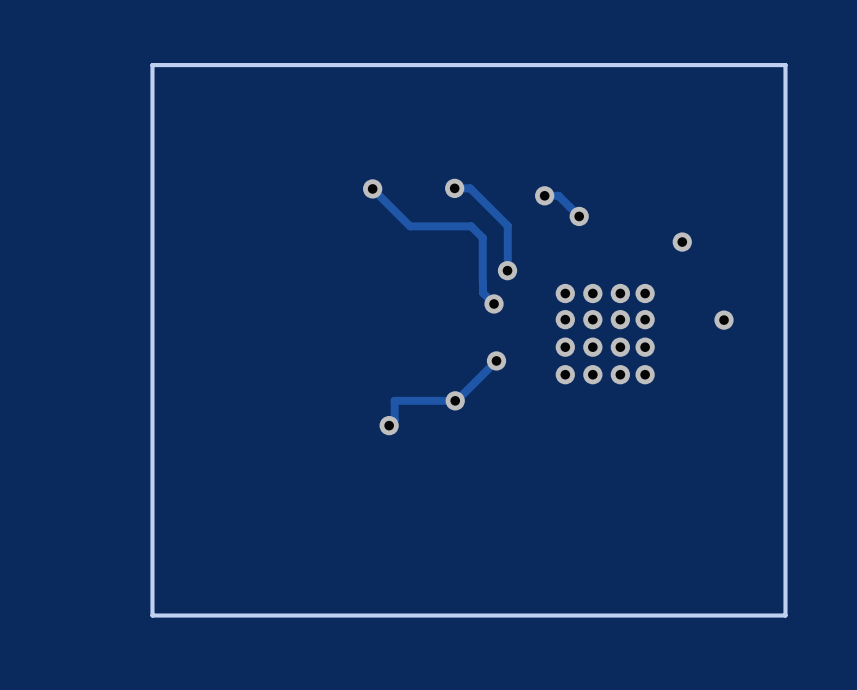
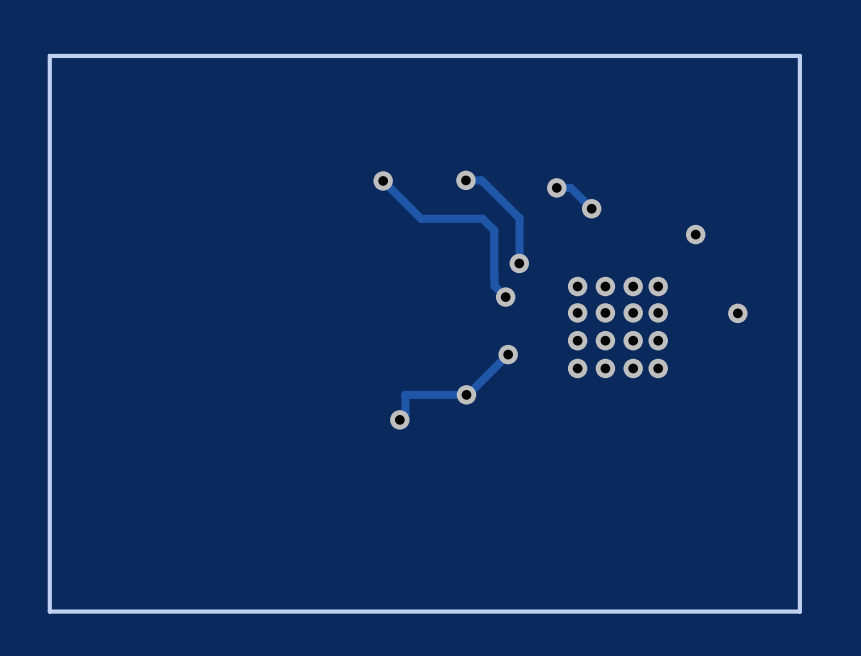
board edge: (152, 65) (152, 615) -> (160, 55) (49, 55) (49, 611) (160, 611)

